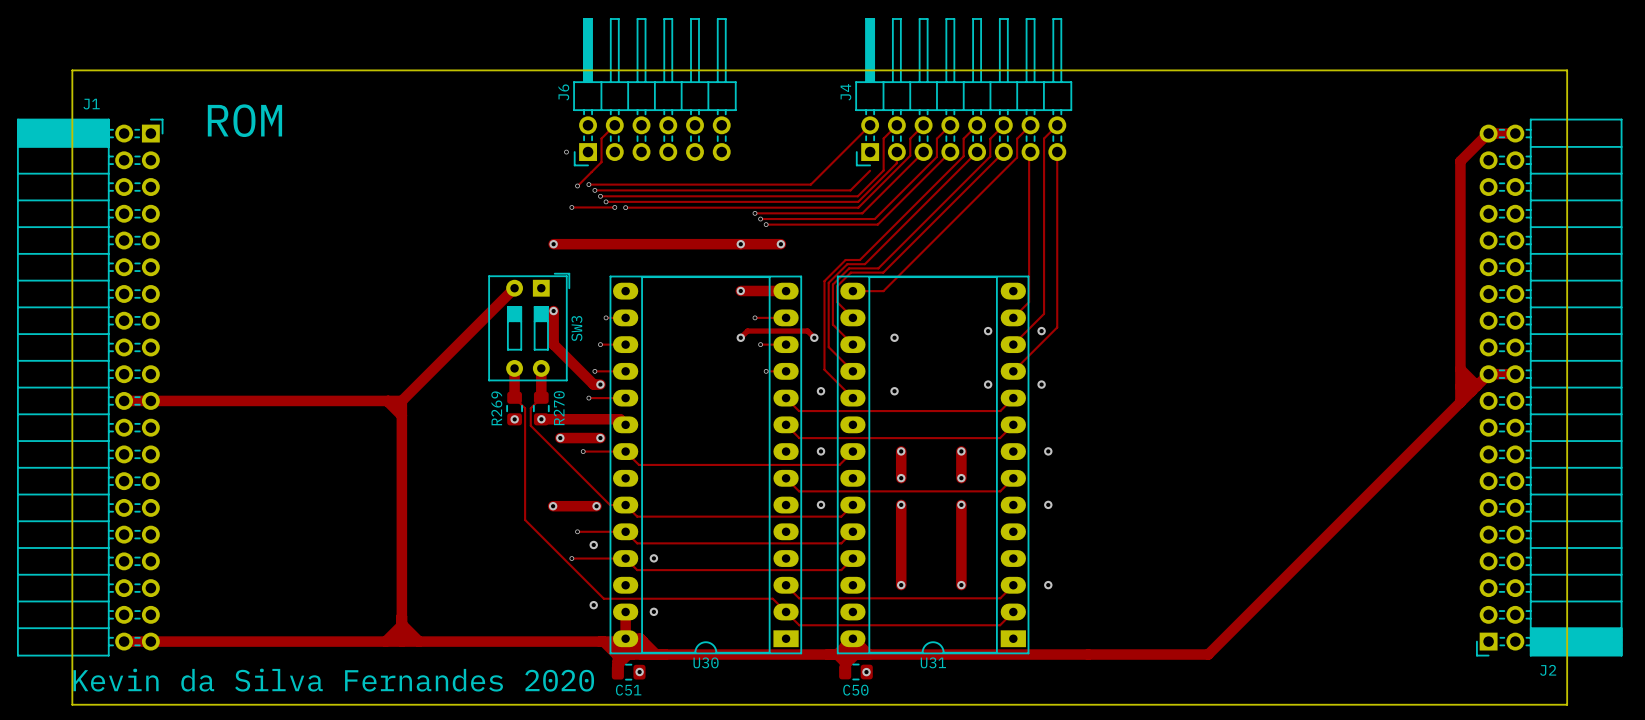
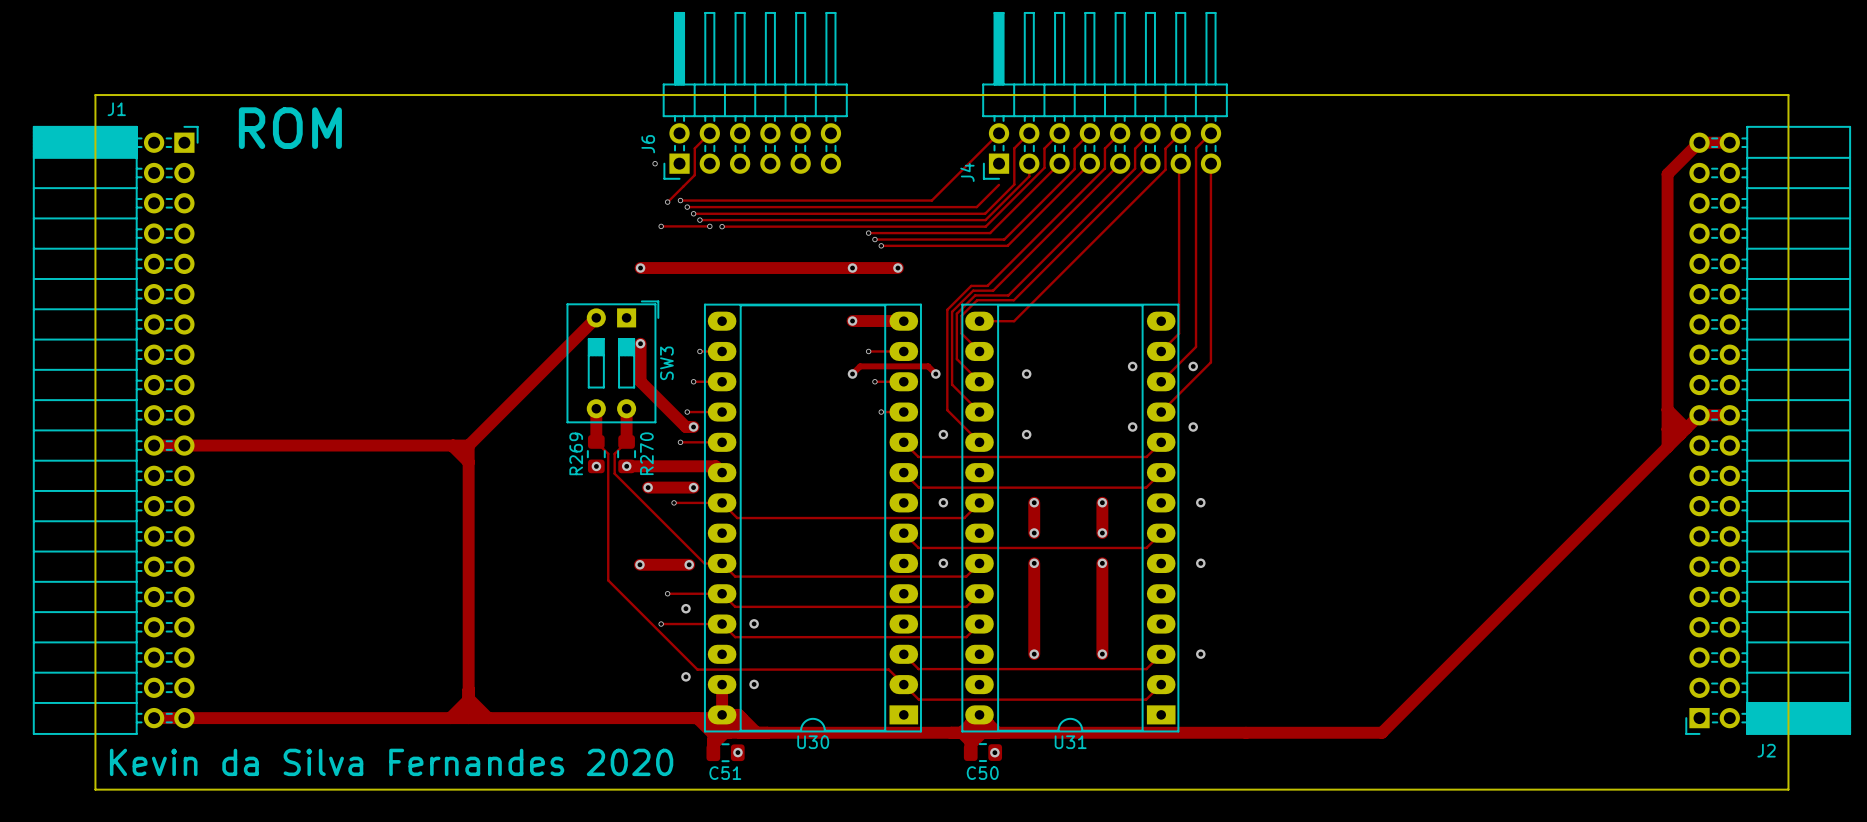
board edge: (72, 91) (72, 70) (1567, 70) (1567, 91) -> (95, 95) (1788, 95)
J6 name position: J6 (563, 92) -> J6 (648, 144)
J4 name position: J4 (845, 92) -> J4 (967, 172)

